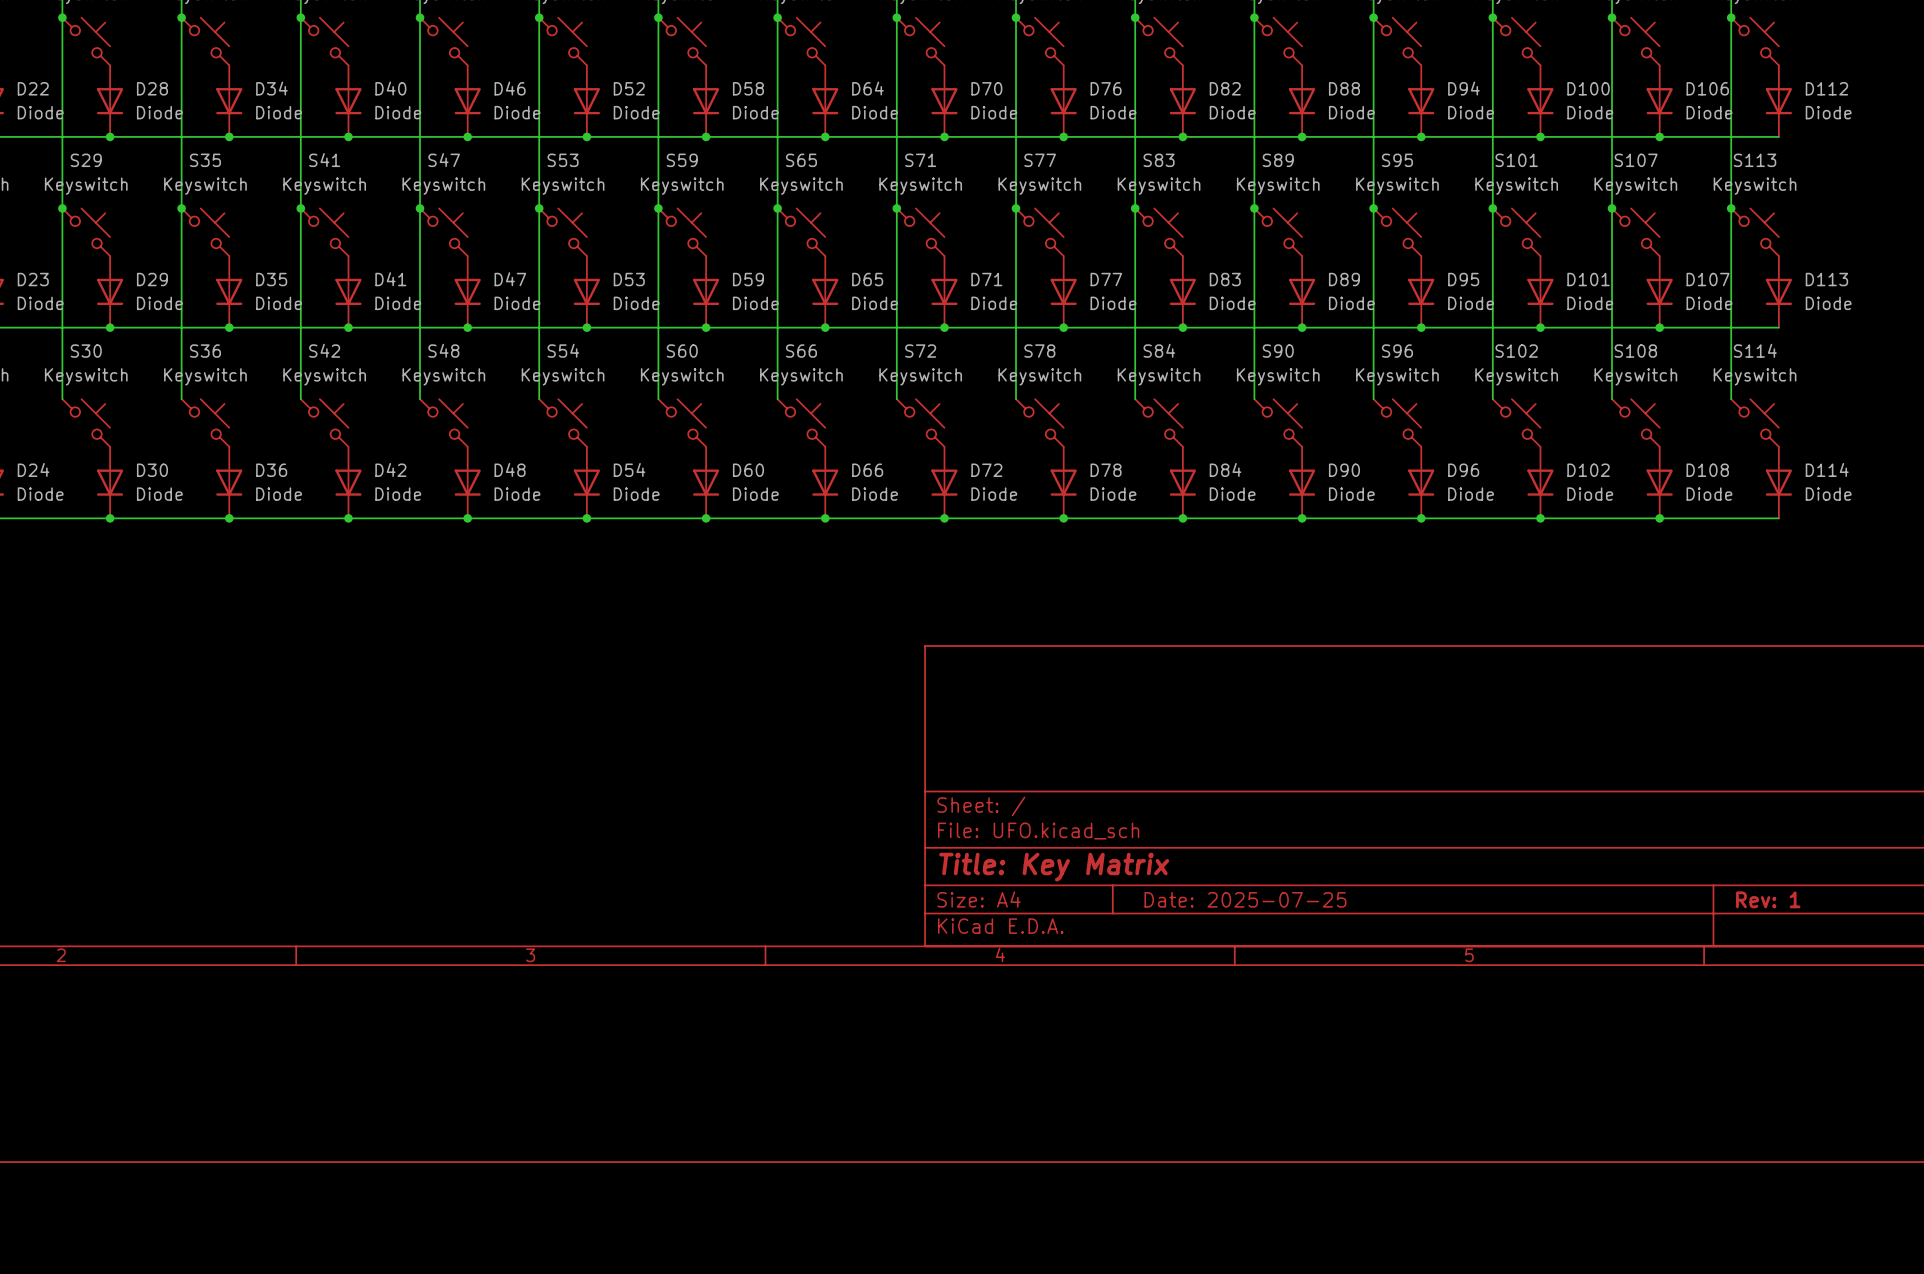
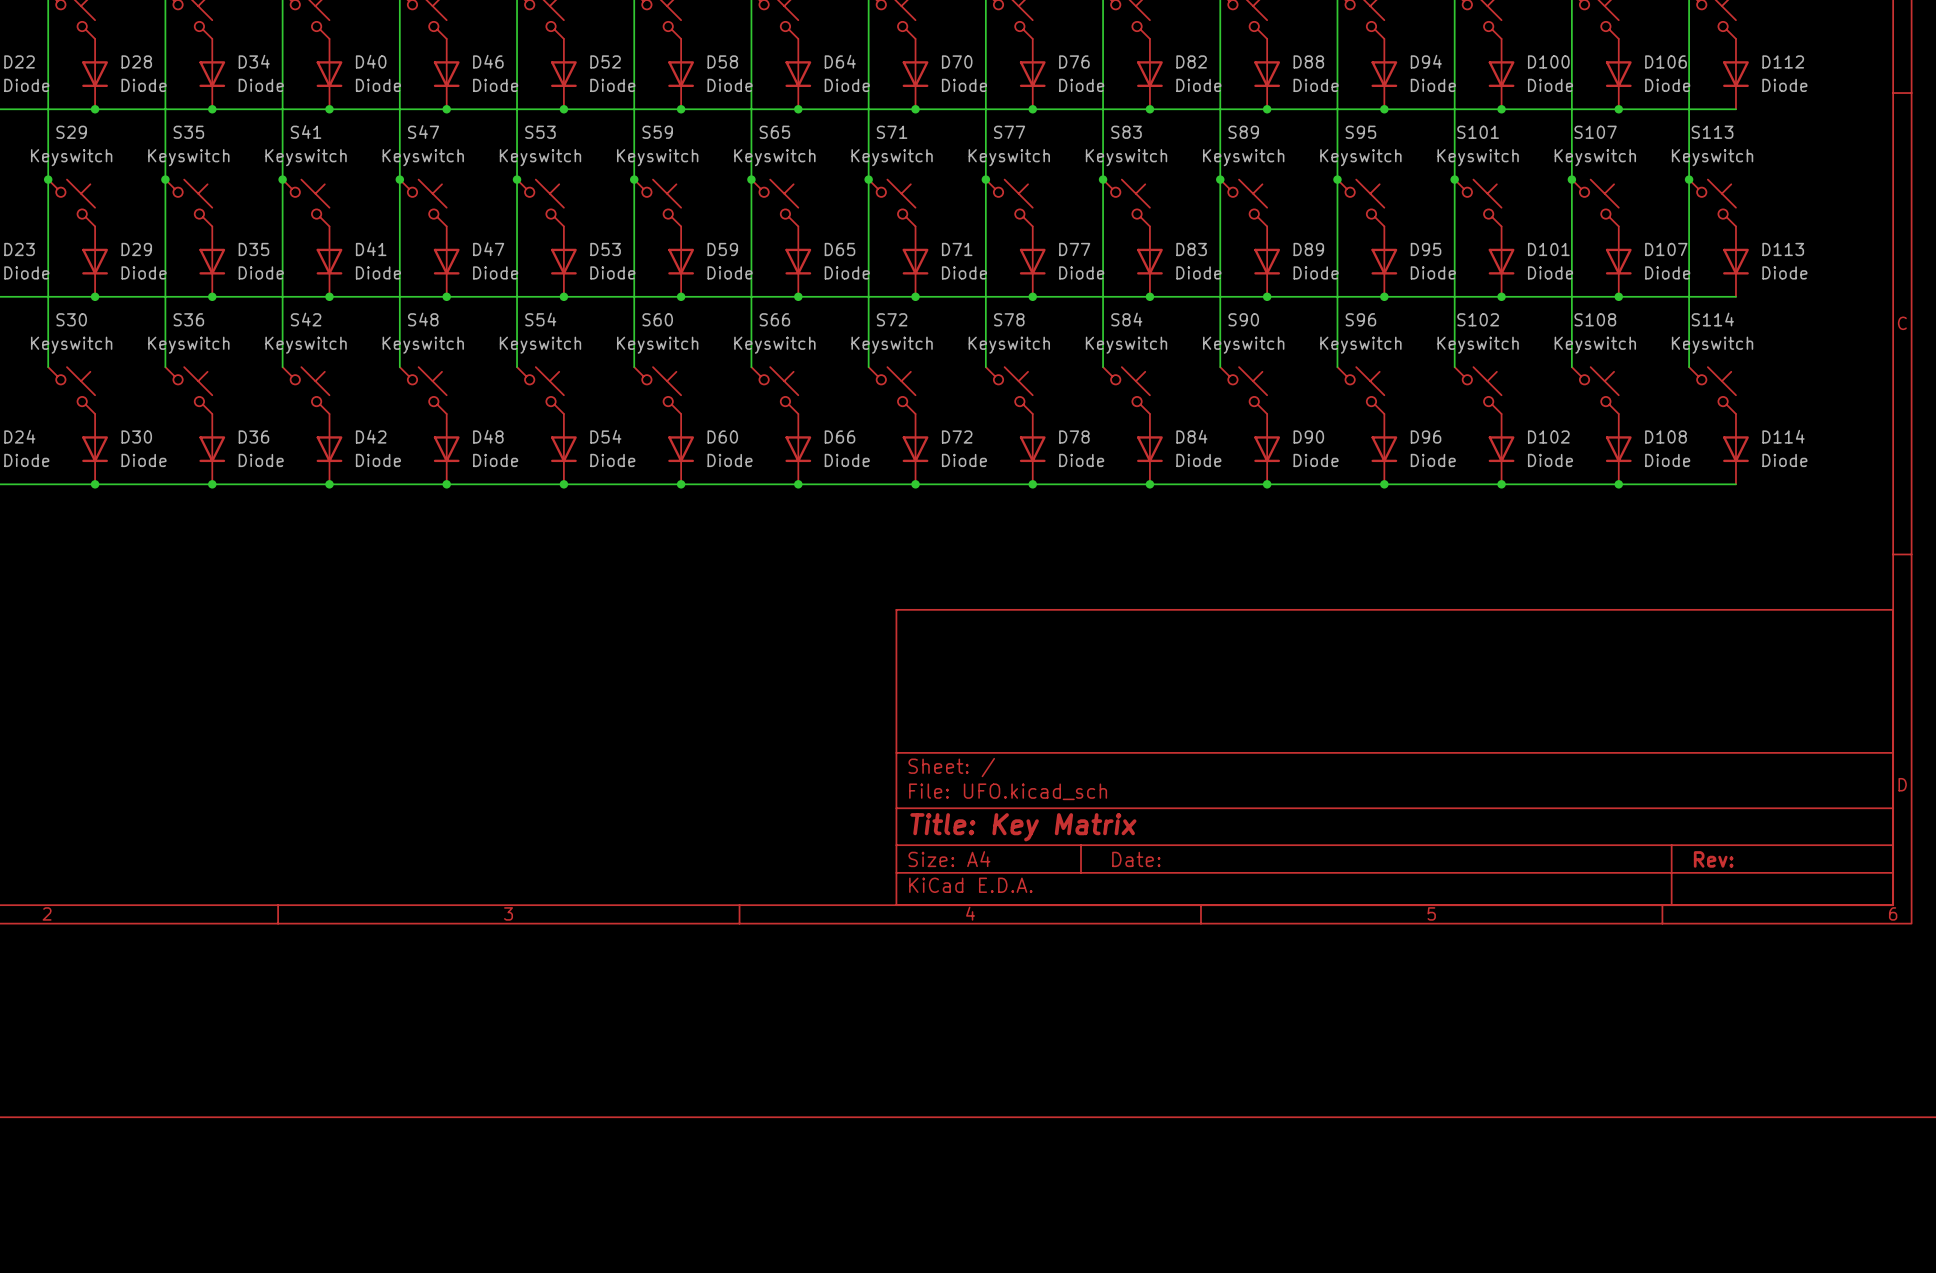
title block: Date: 2025-07-25 (1245, 899) -> Date: (1136, 859)
title block: Rev: 1 (1768, 899) -> Rev: (1713, 859)

